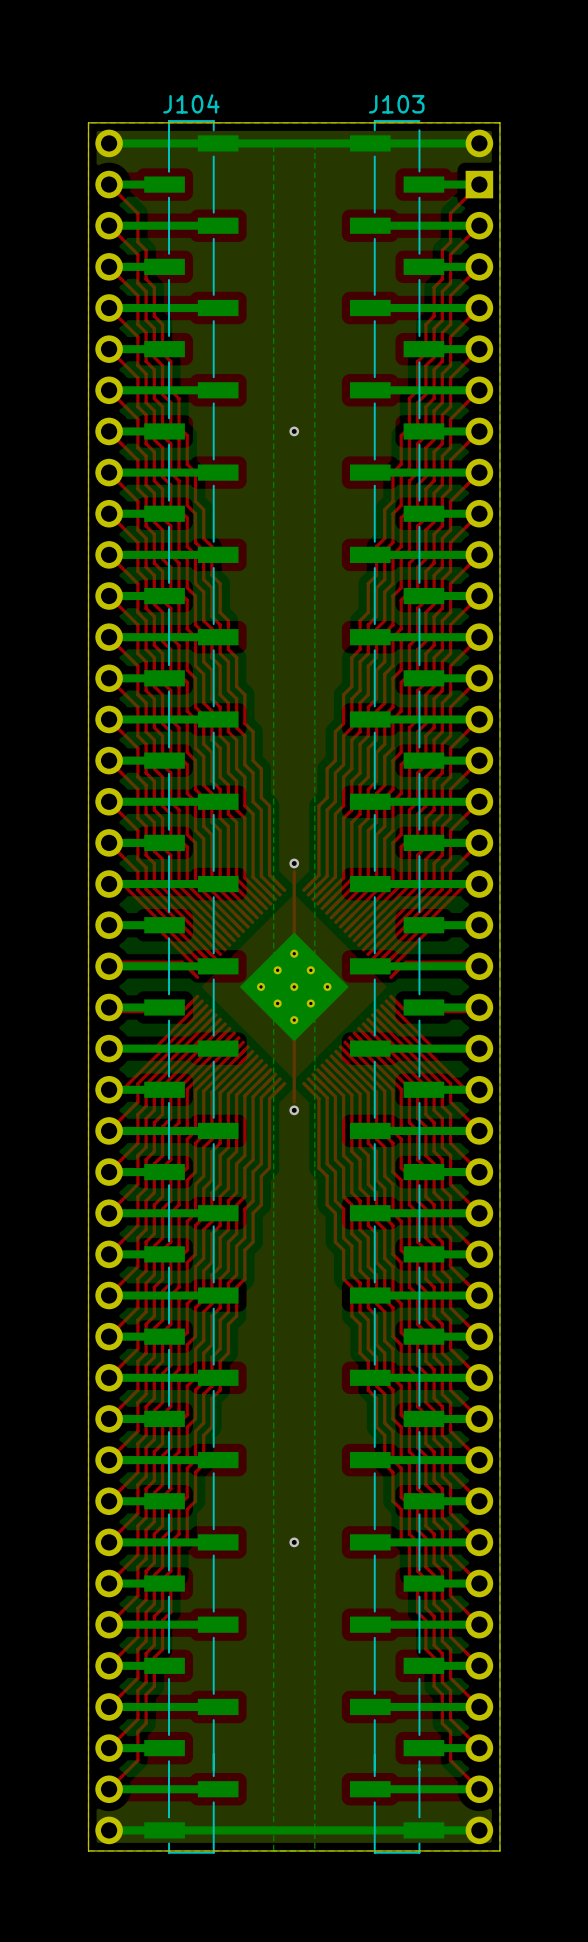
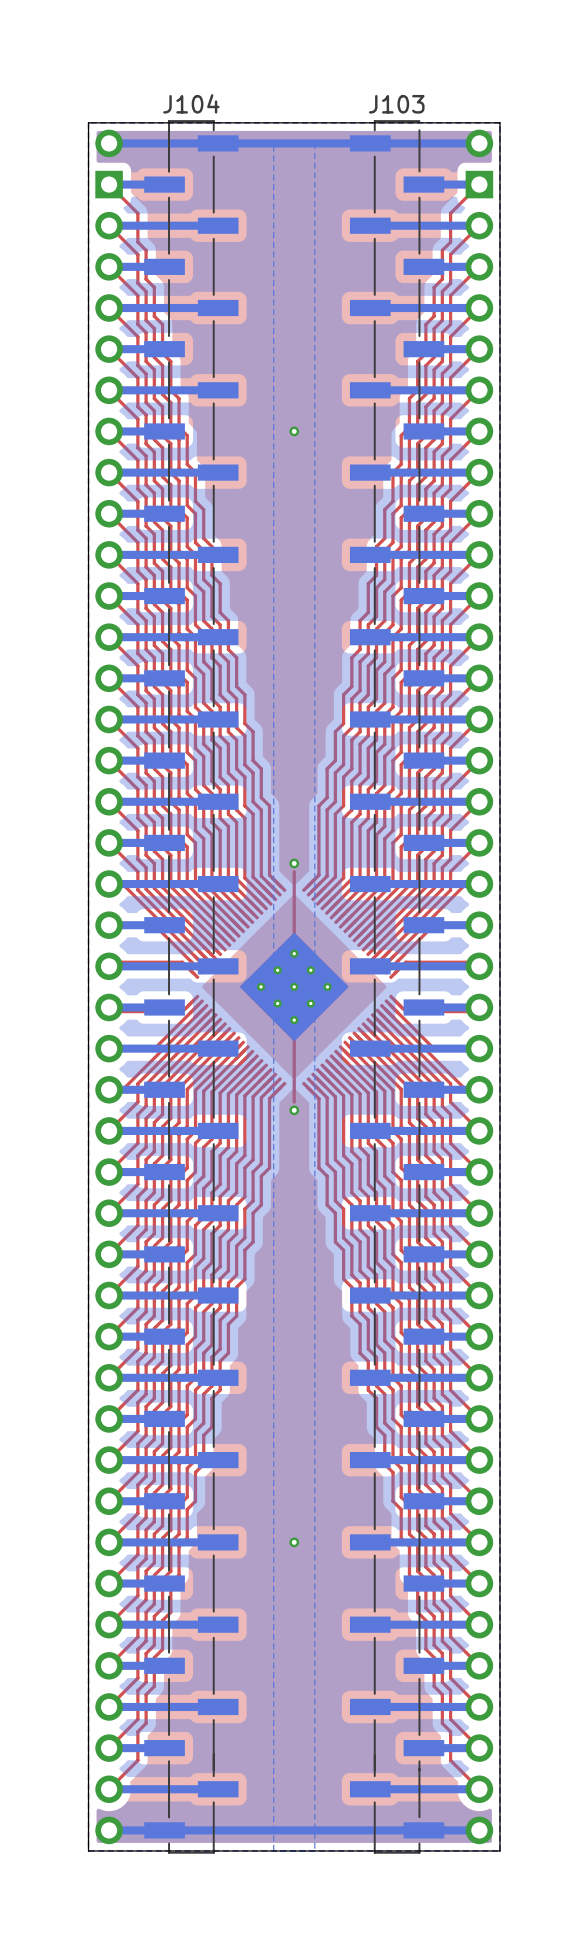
part footprint: [95, 129, 123, 1762] -> [95, 129, 123, 1762]

